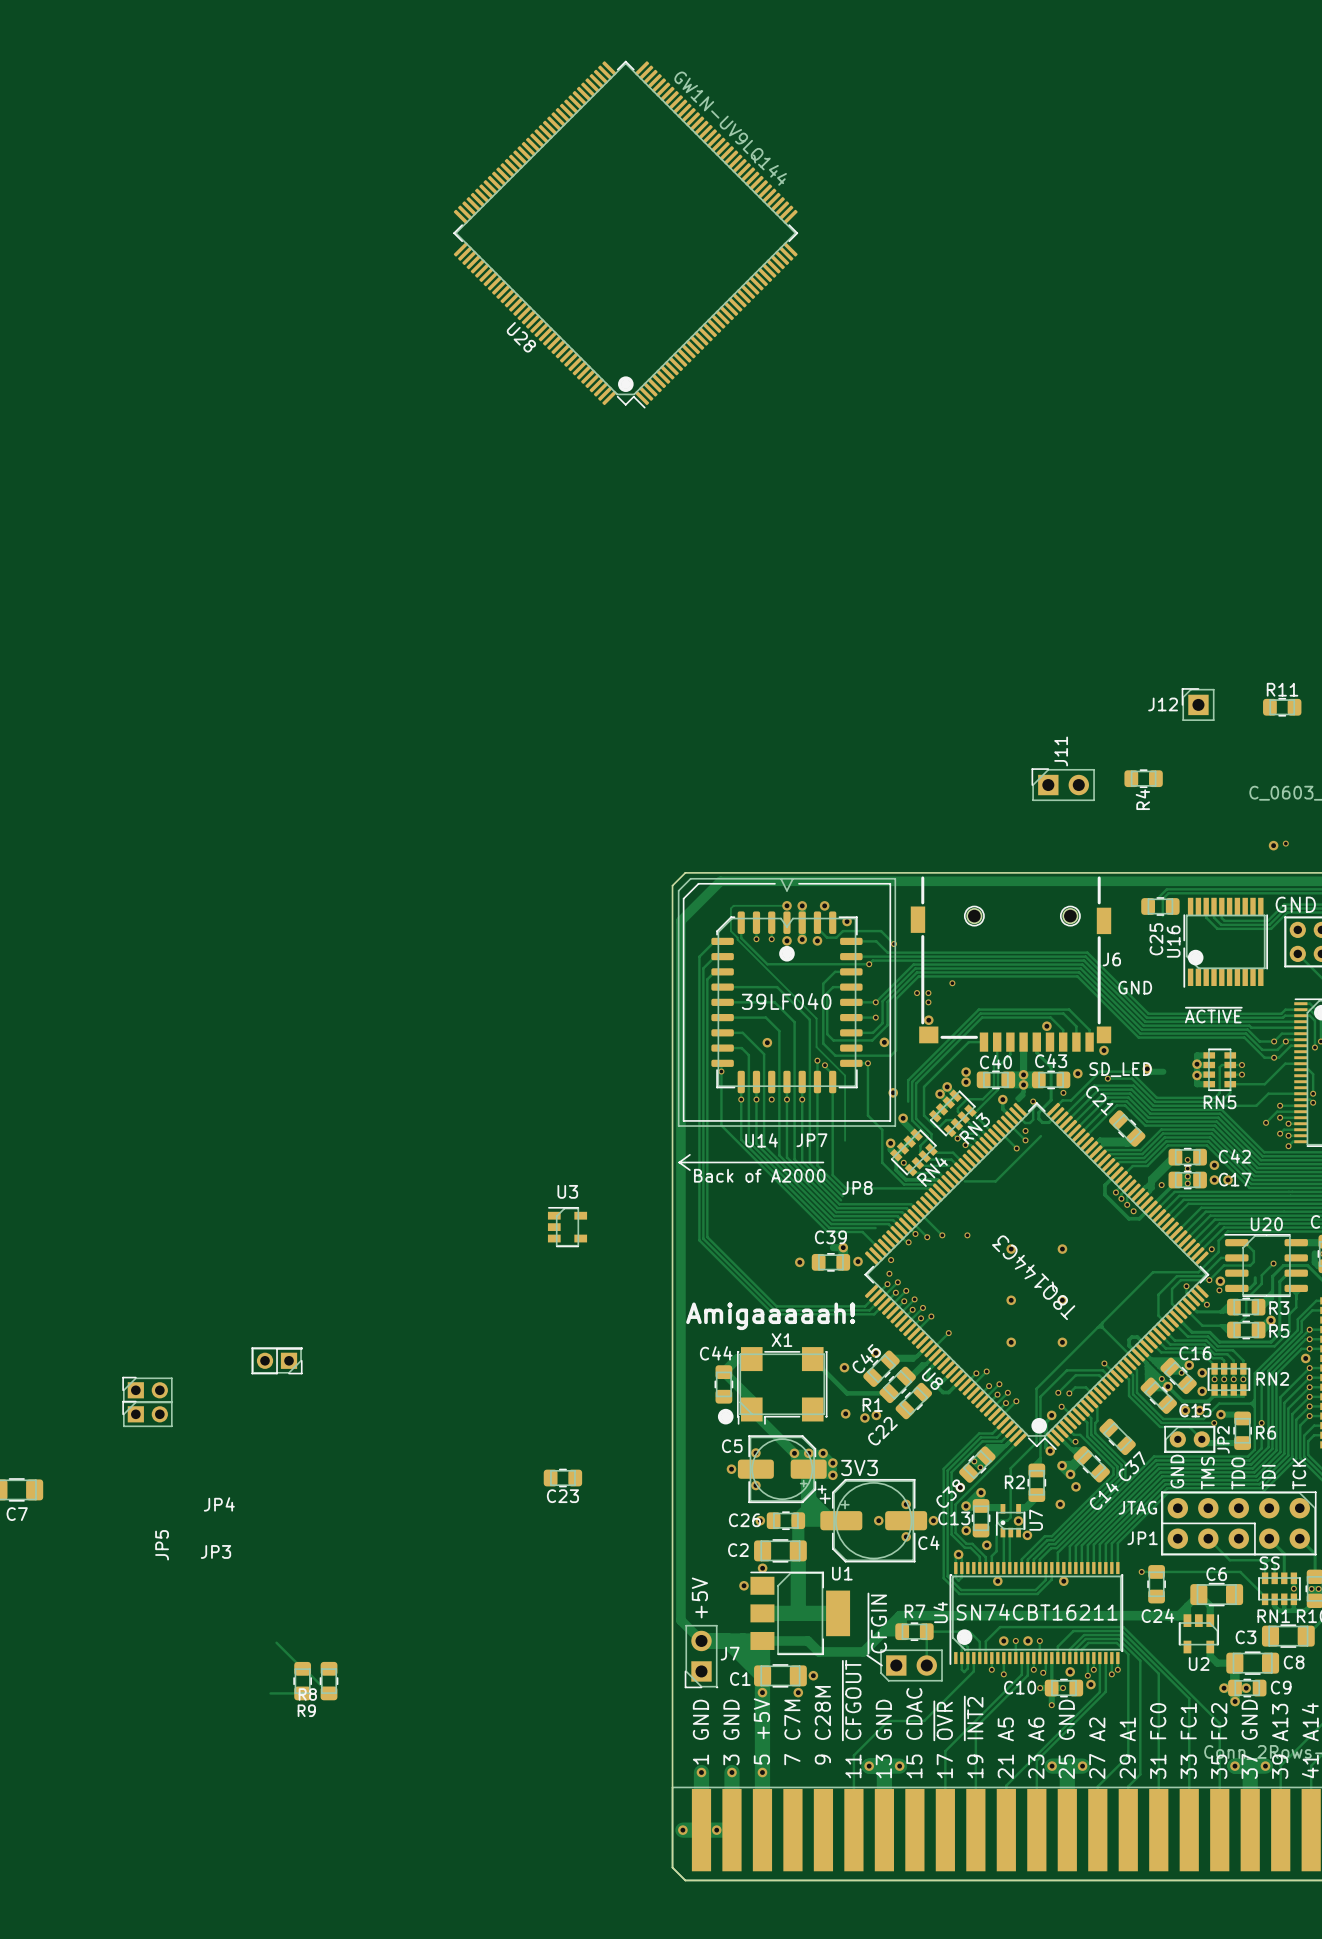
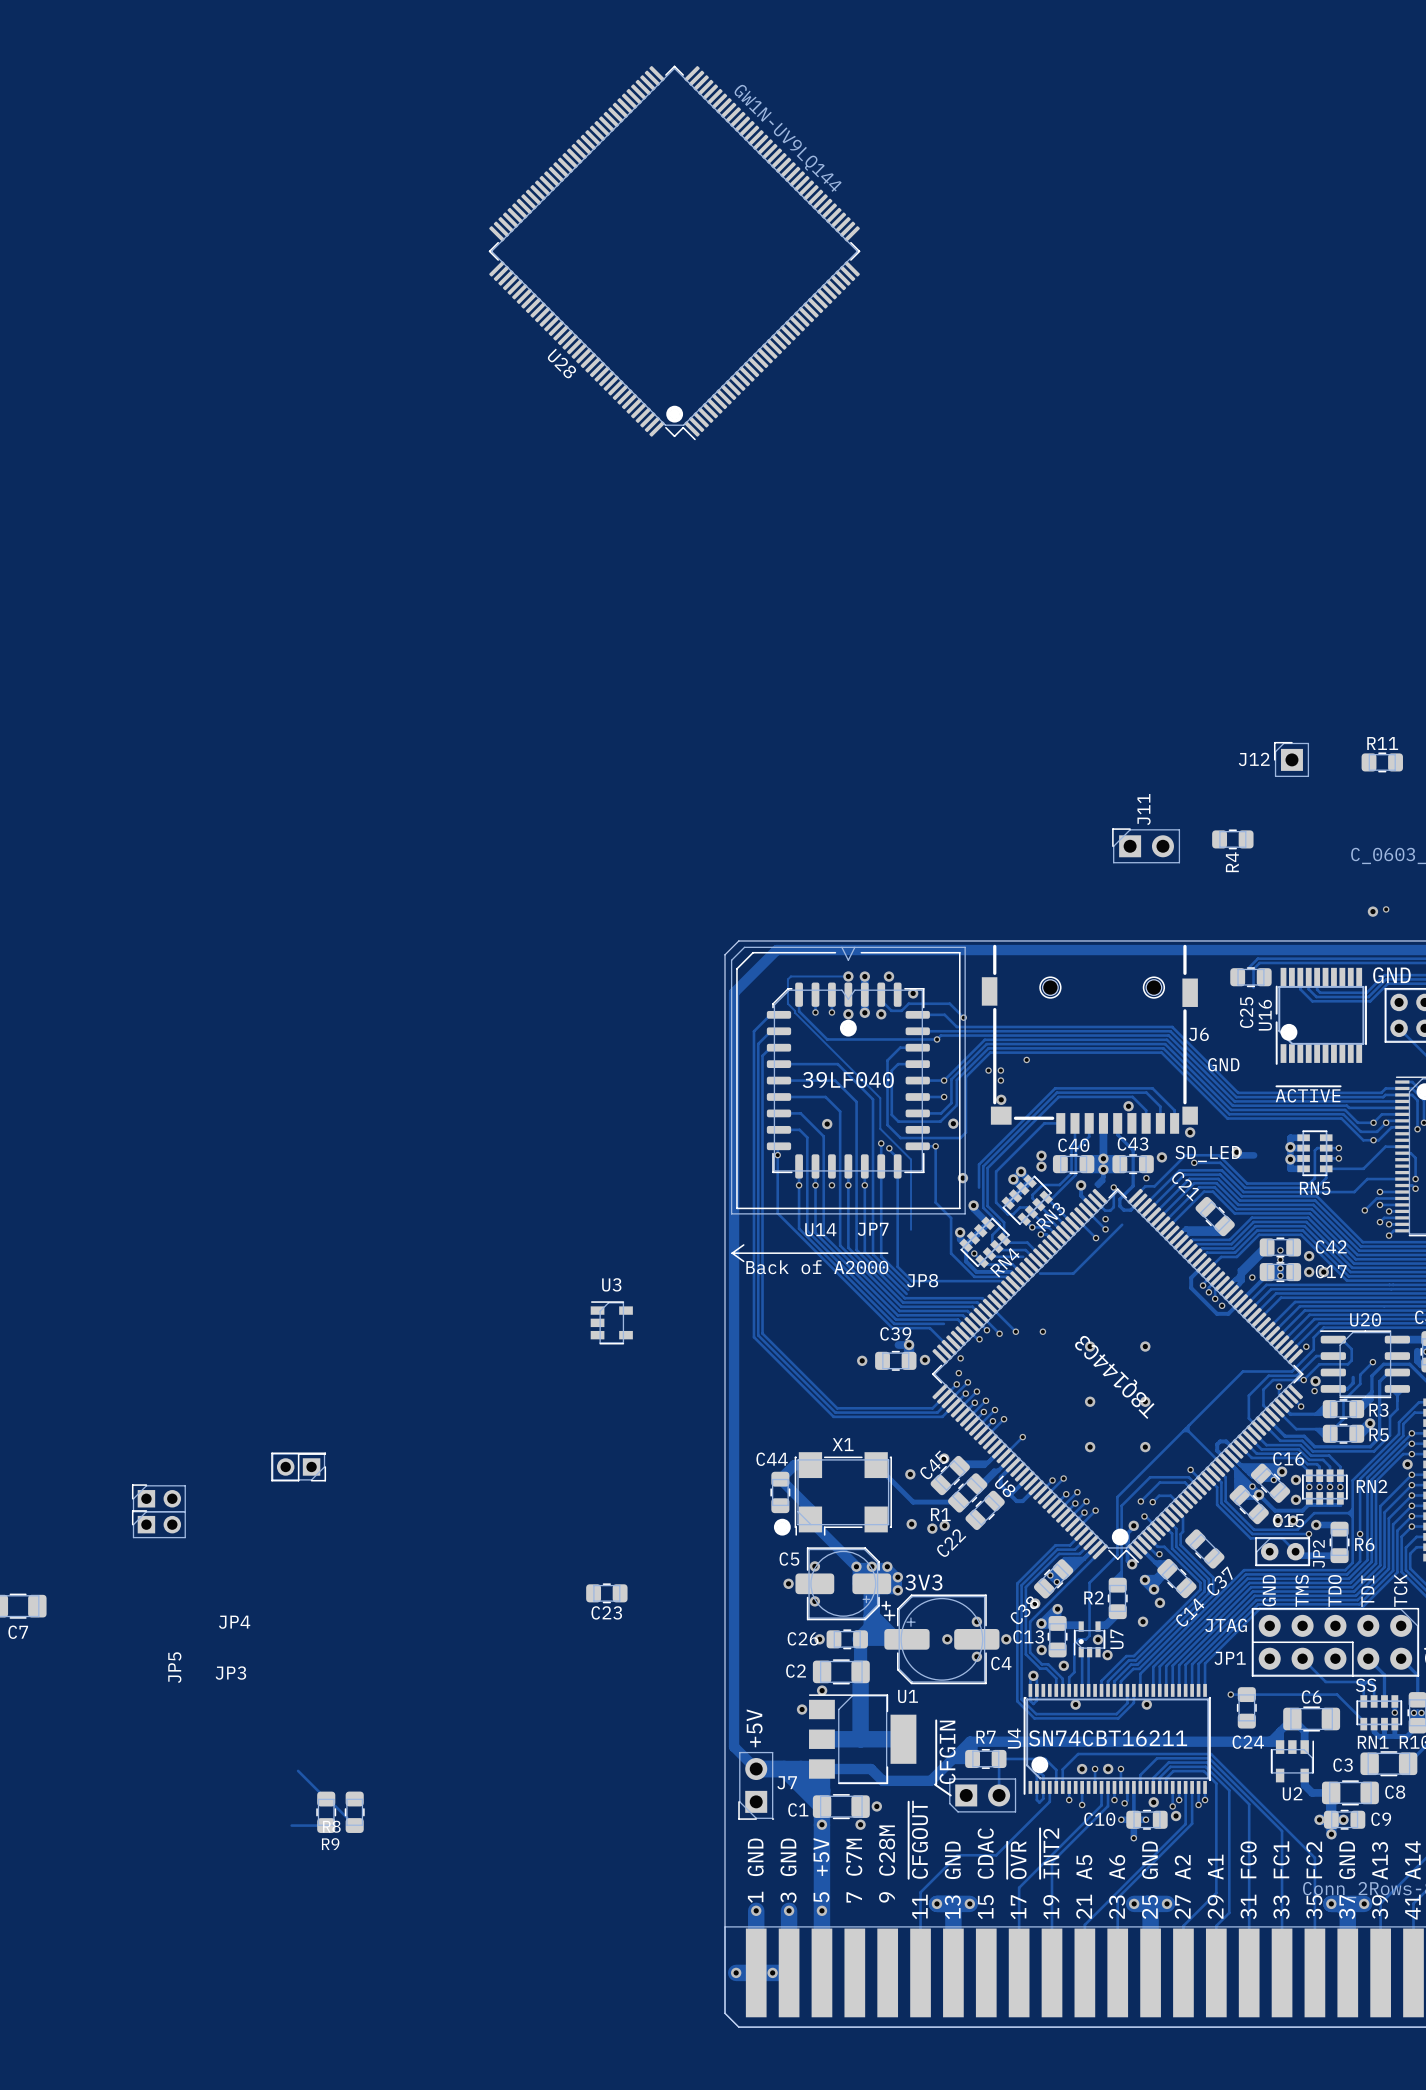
text: Amigaaaaah! (770, 1316) -> none

